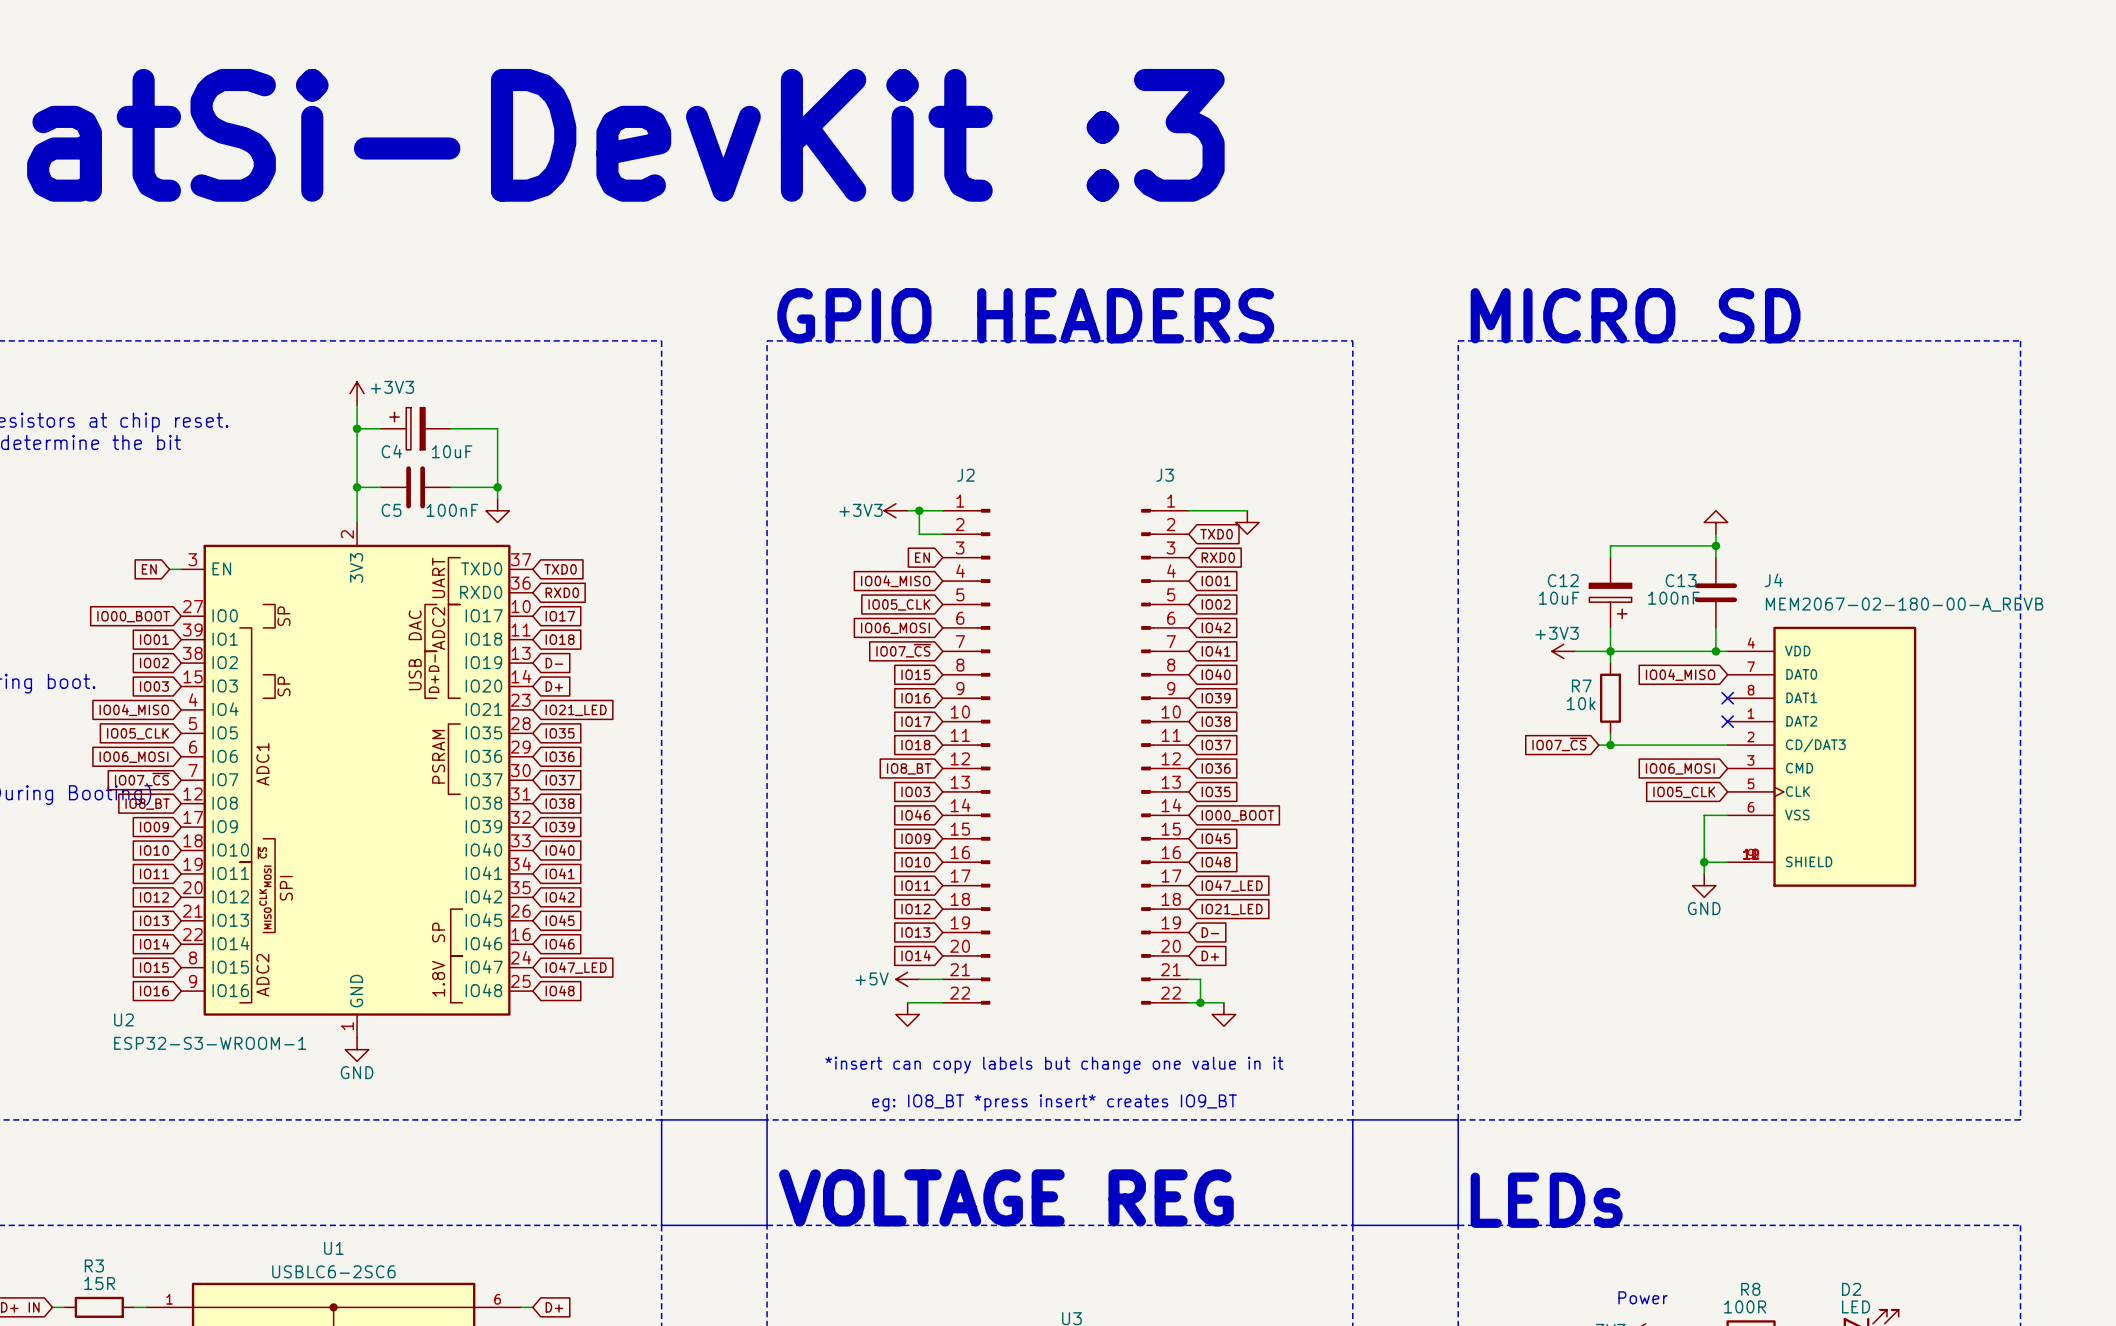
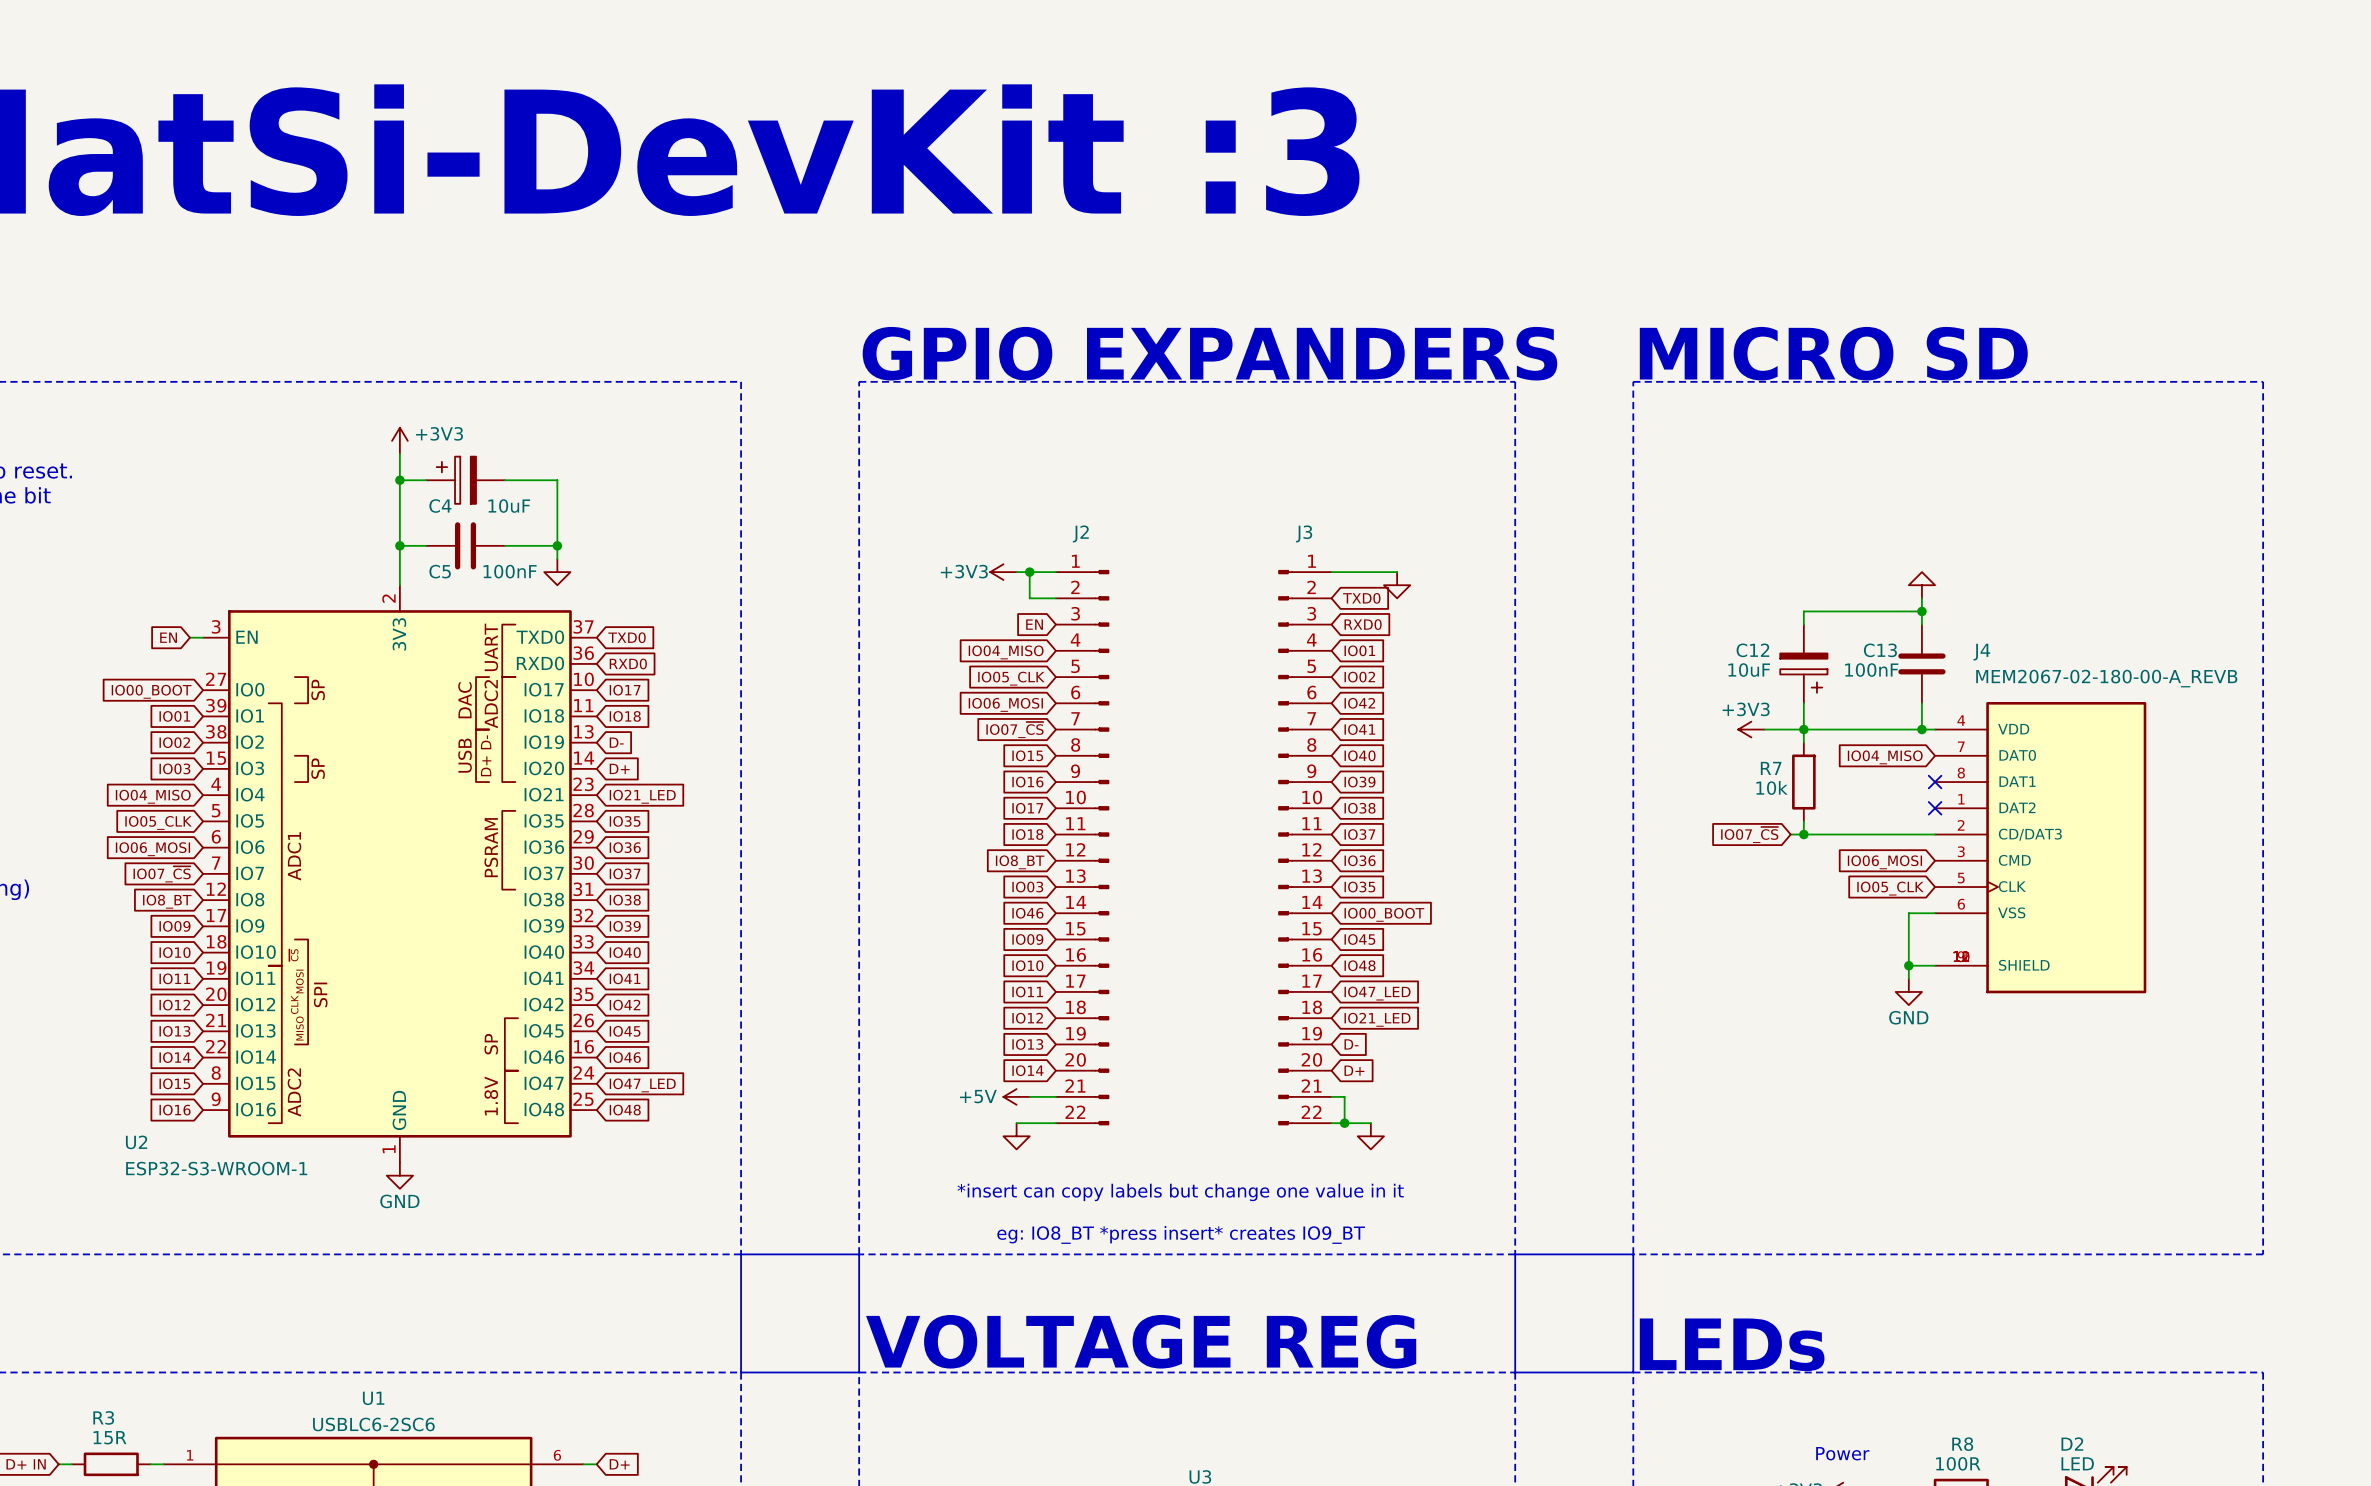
text: GPIO HEADERS (1025, 315) -> GPIO EXPANDERS (1209, 353)

